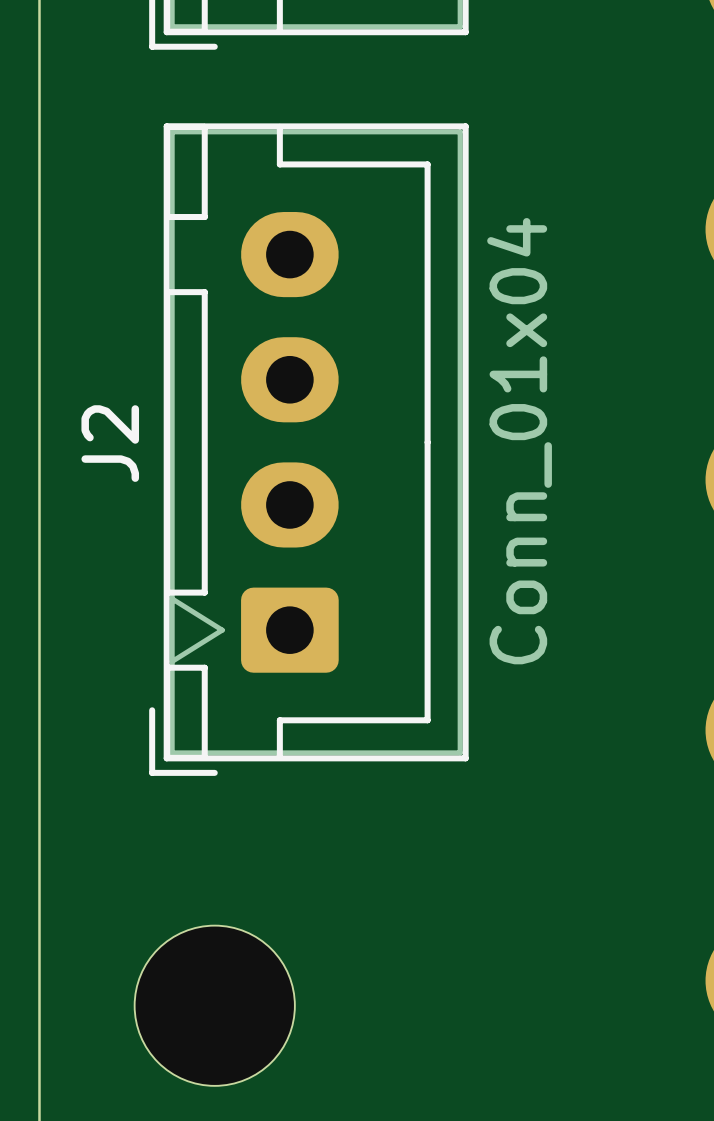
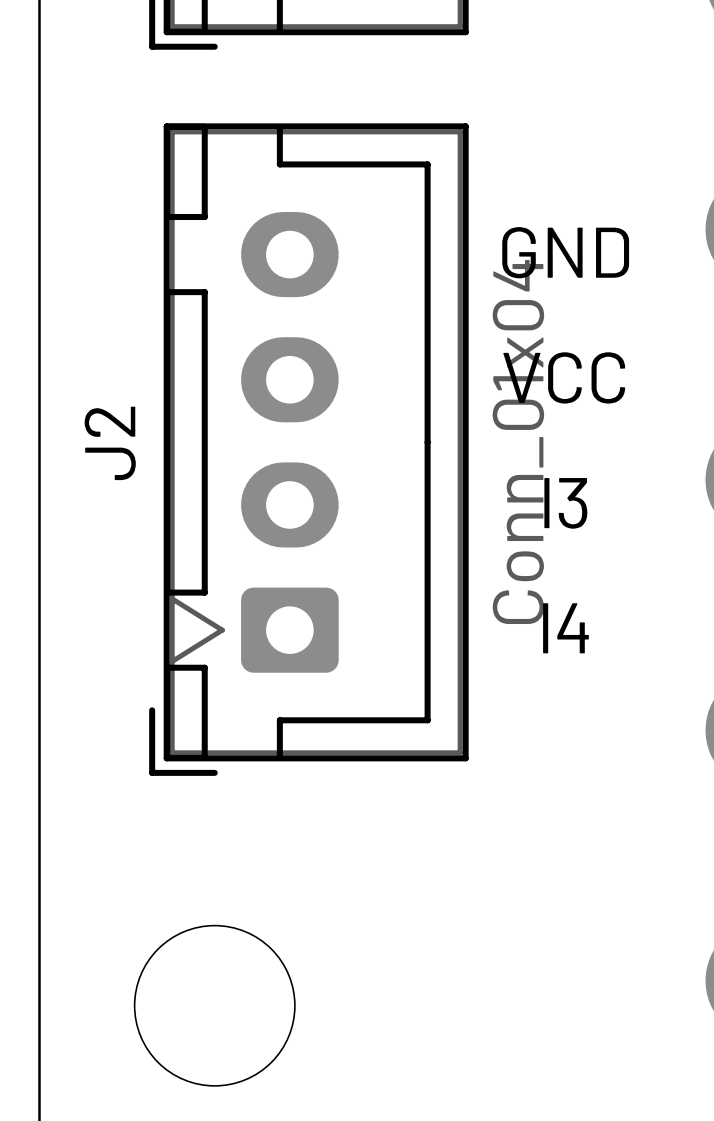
text: none -> GND (565, 252)
text: none -> VCC (564, 377)
text: none -> l3 (565, 503)
text: none -> l4 (565, 628)

